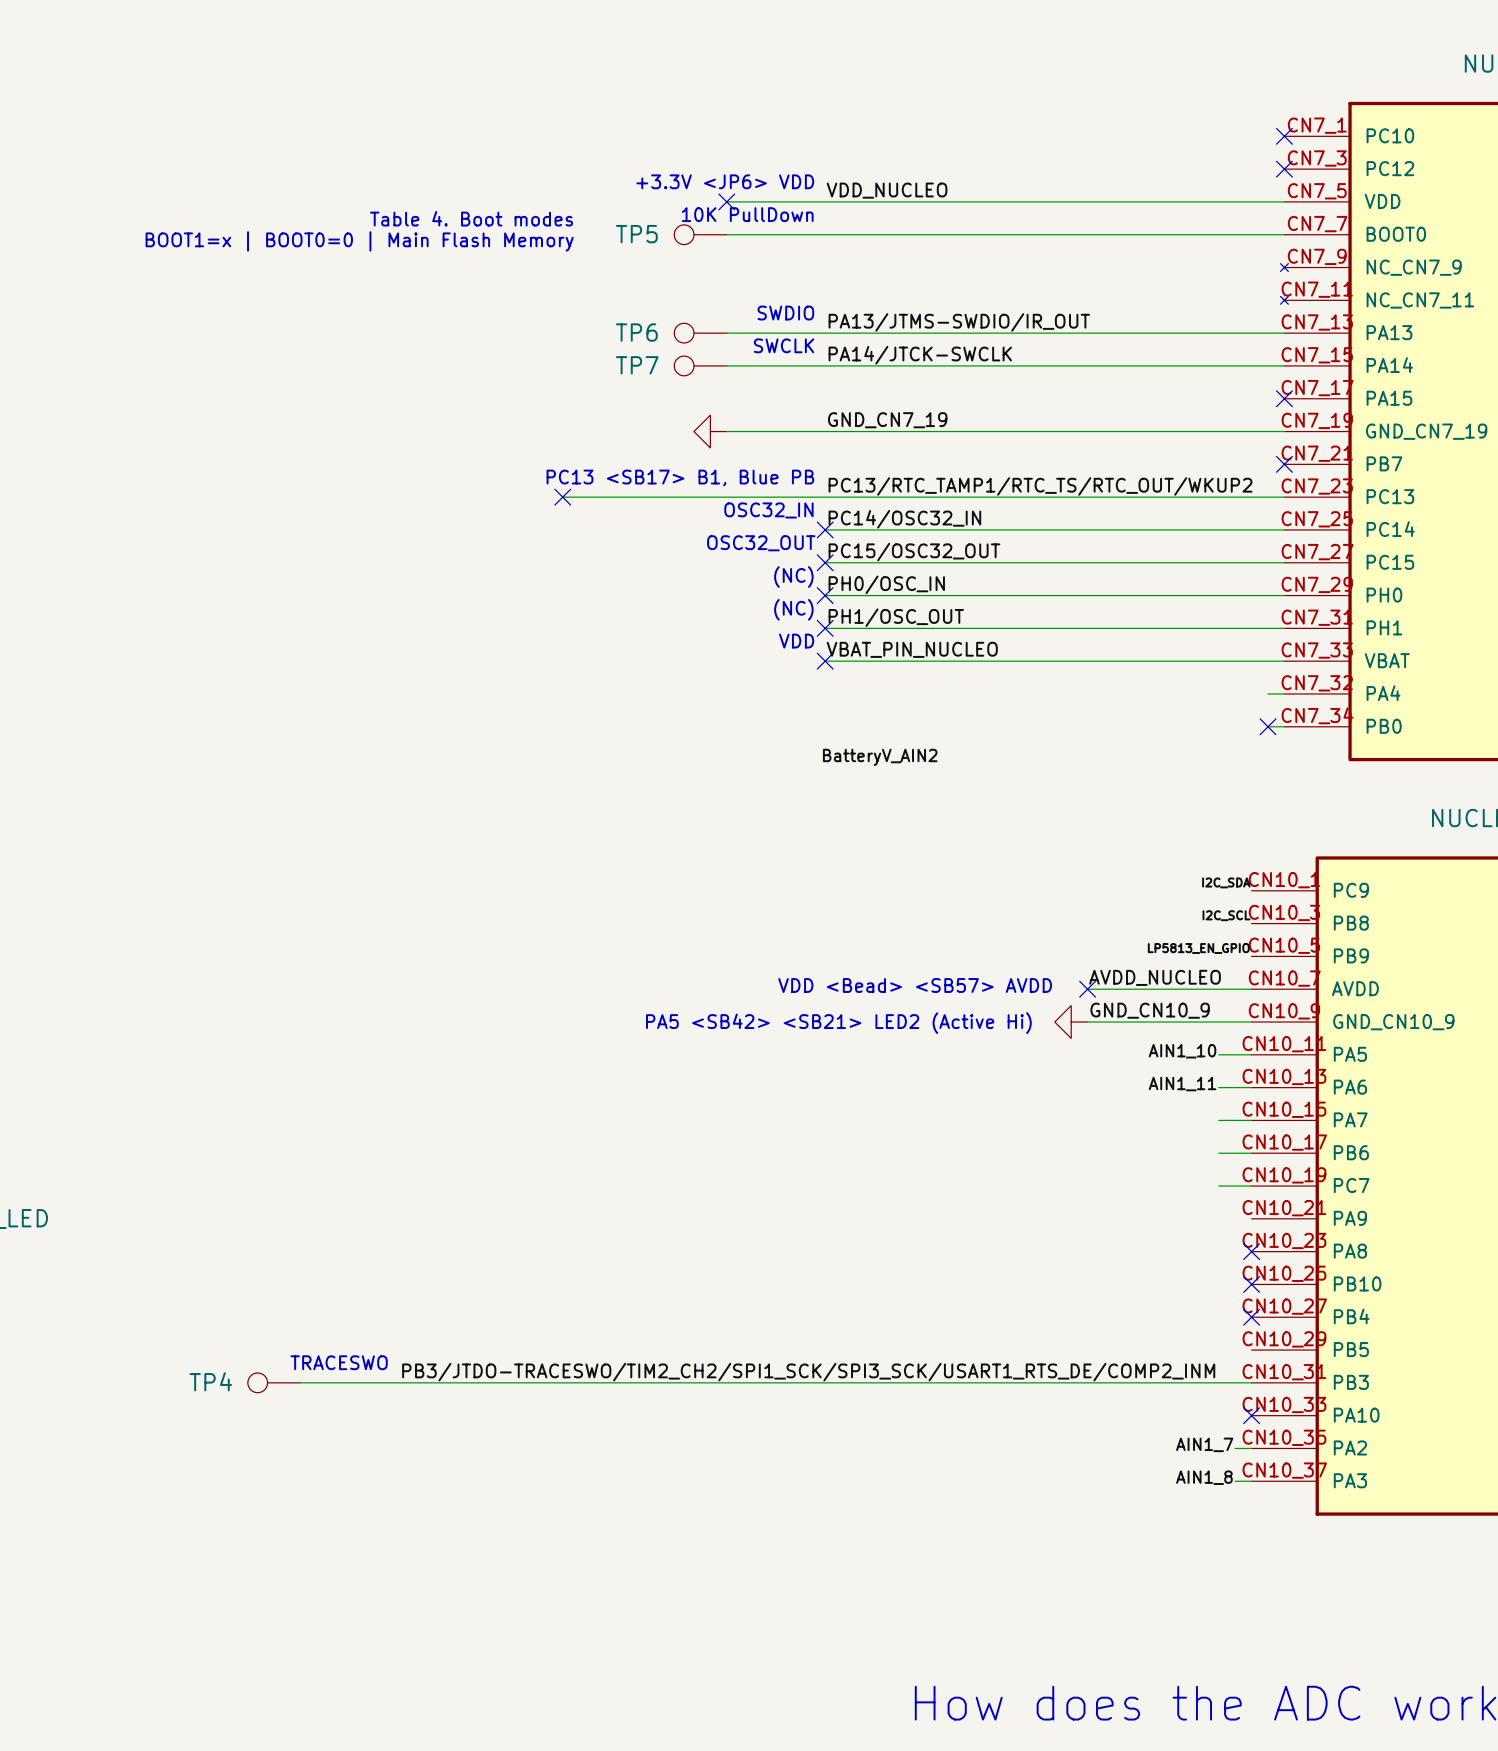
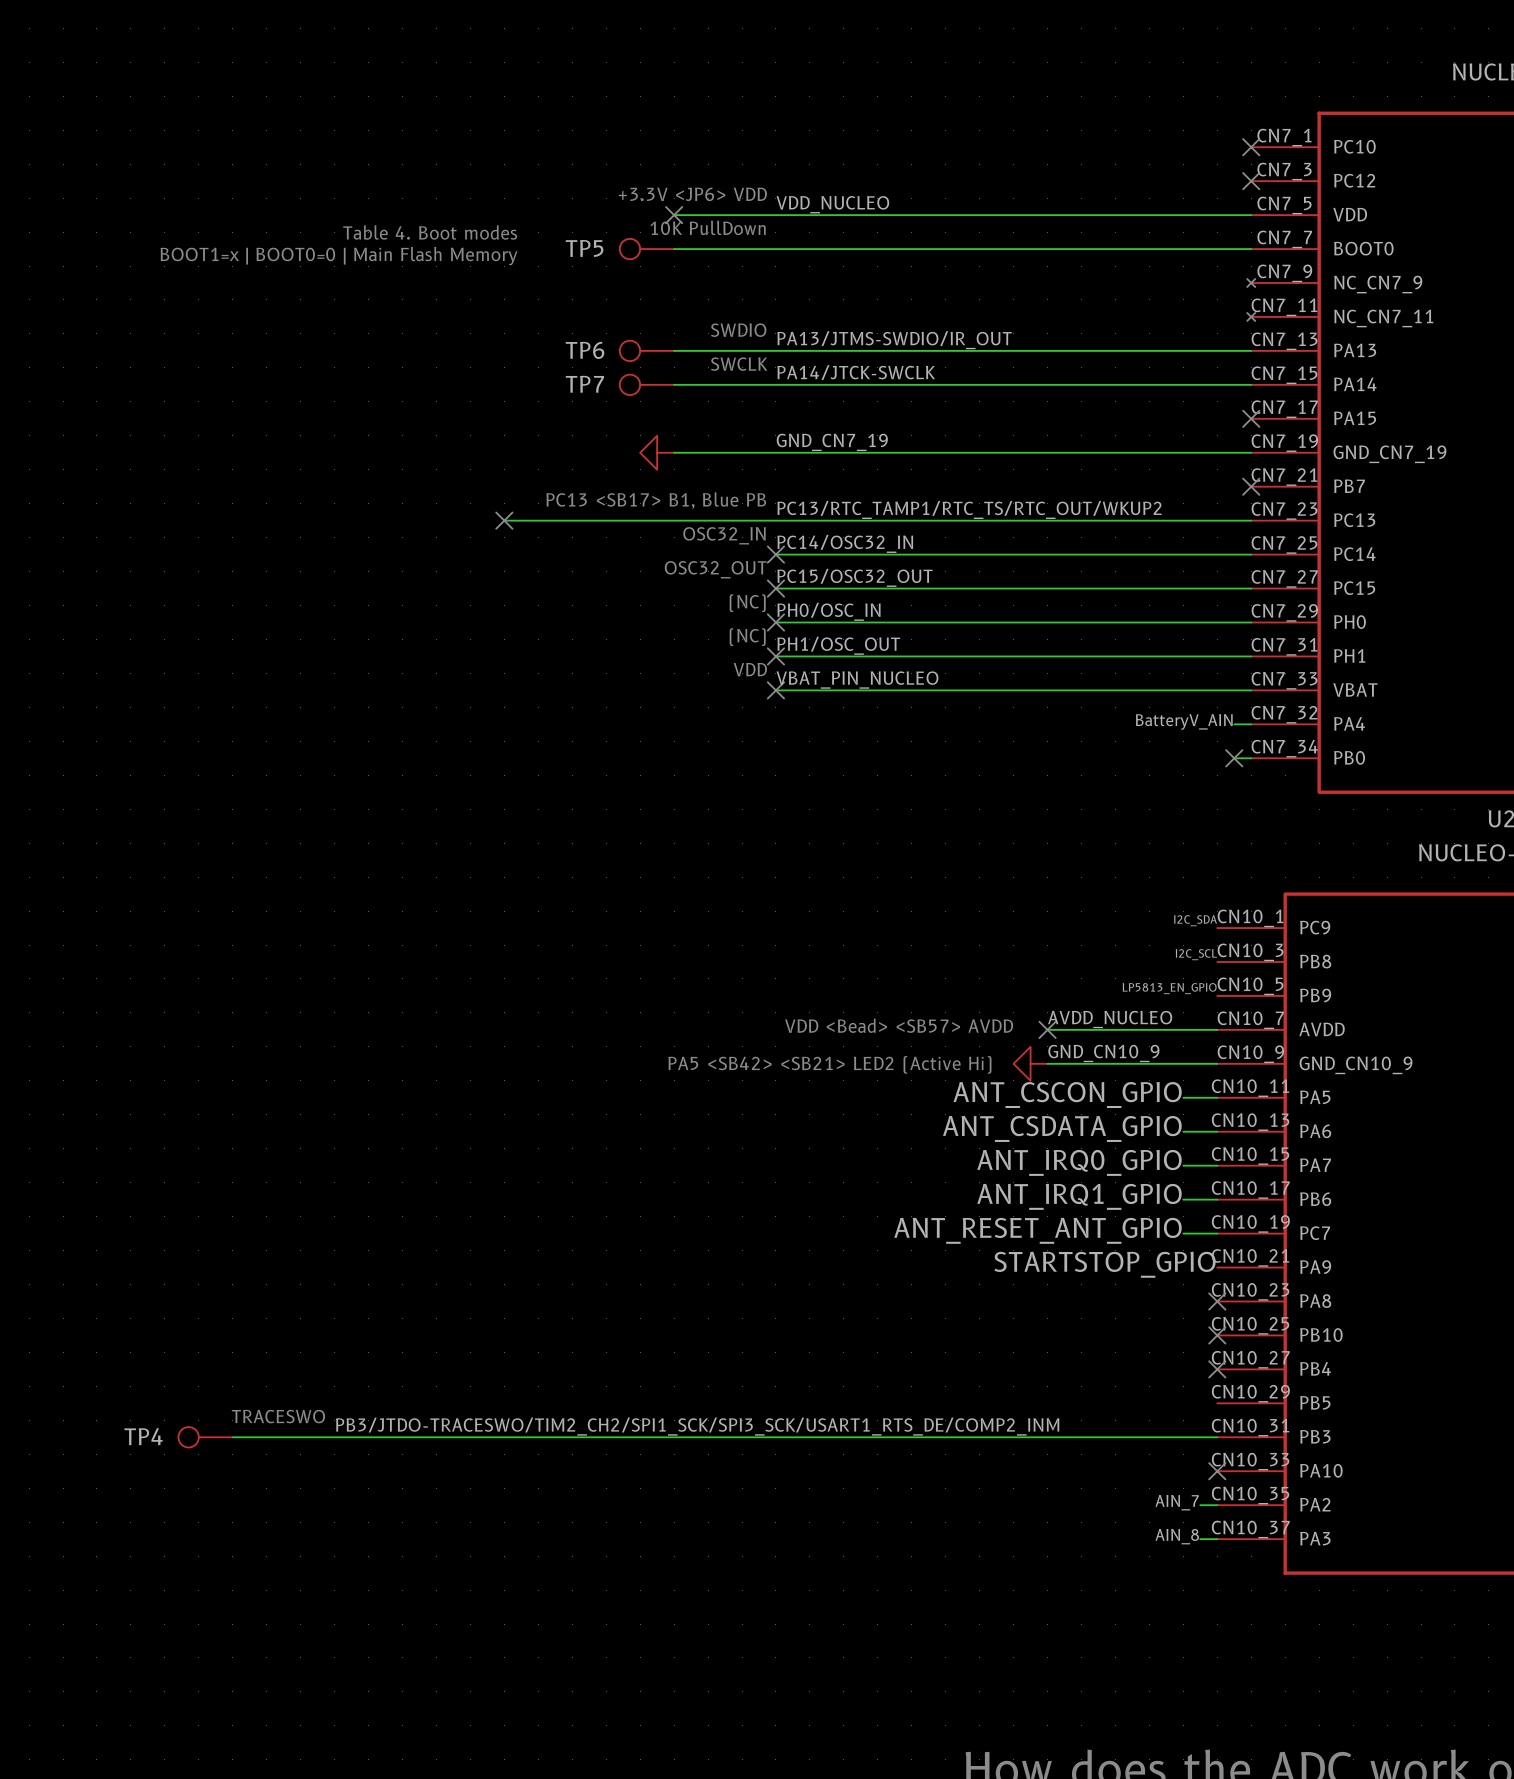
label: none -> BatteryV_AIN (1184, 721)
label: BatteryV_AIN2 (880, 757) -> none
label: AIN1_10 (1182, 1051) -> ANT_CSCON_GPIO (1067, 1095)
label: AIN1_11 (1182, 1084) -> ANT_CSDATA_GPIO (1062, 1128)
label: none -> ANT_IRQ0_GPIO (1079, 1162)
label: none -> ANT_IRQ1_GPIO (1079, 1196)
label: none -> ANT_RESET_ANT_GPIO (1037, 1230)
label: none -> STARTSTOP_GPIO (1105, 1264)
label: AIN1_7 (1204, 1444) -> AIN_7 (1177, 1502)
label: AIN1_8 (1204, 1477) -> AIN_8 (1177, 1536)

